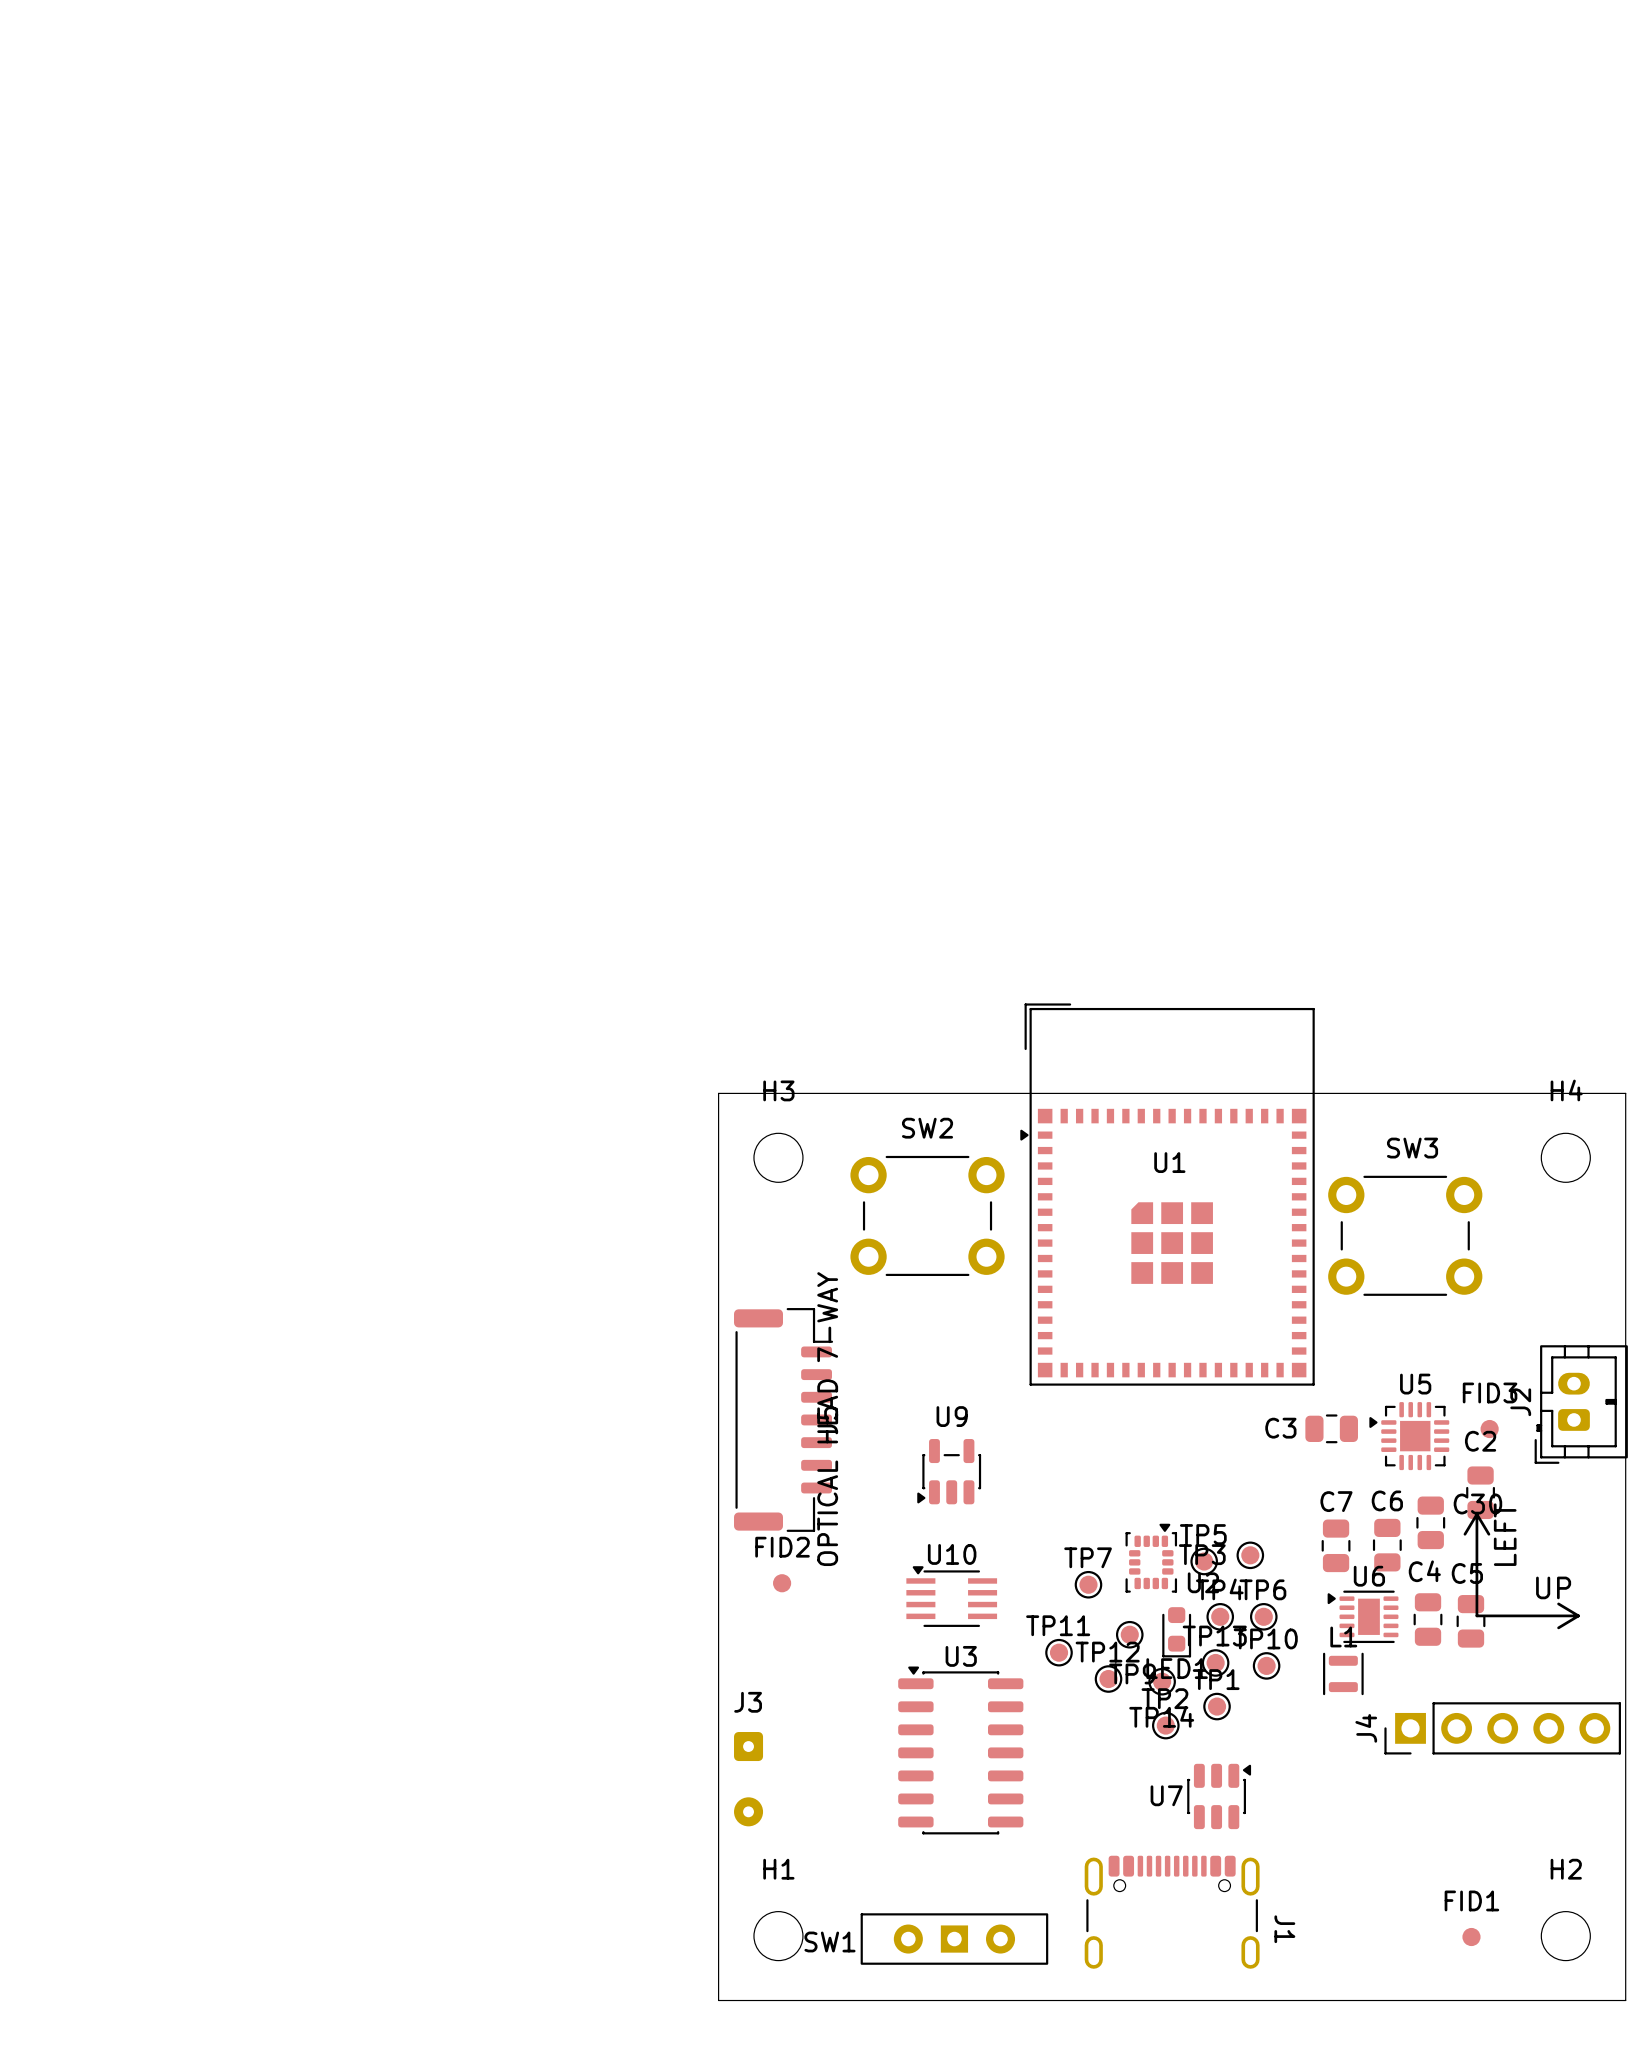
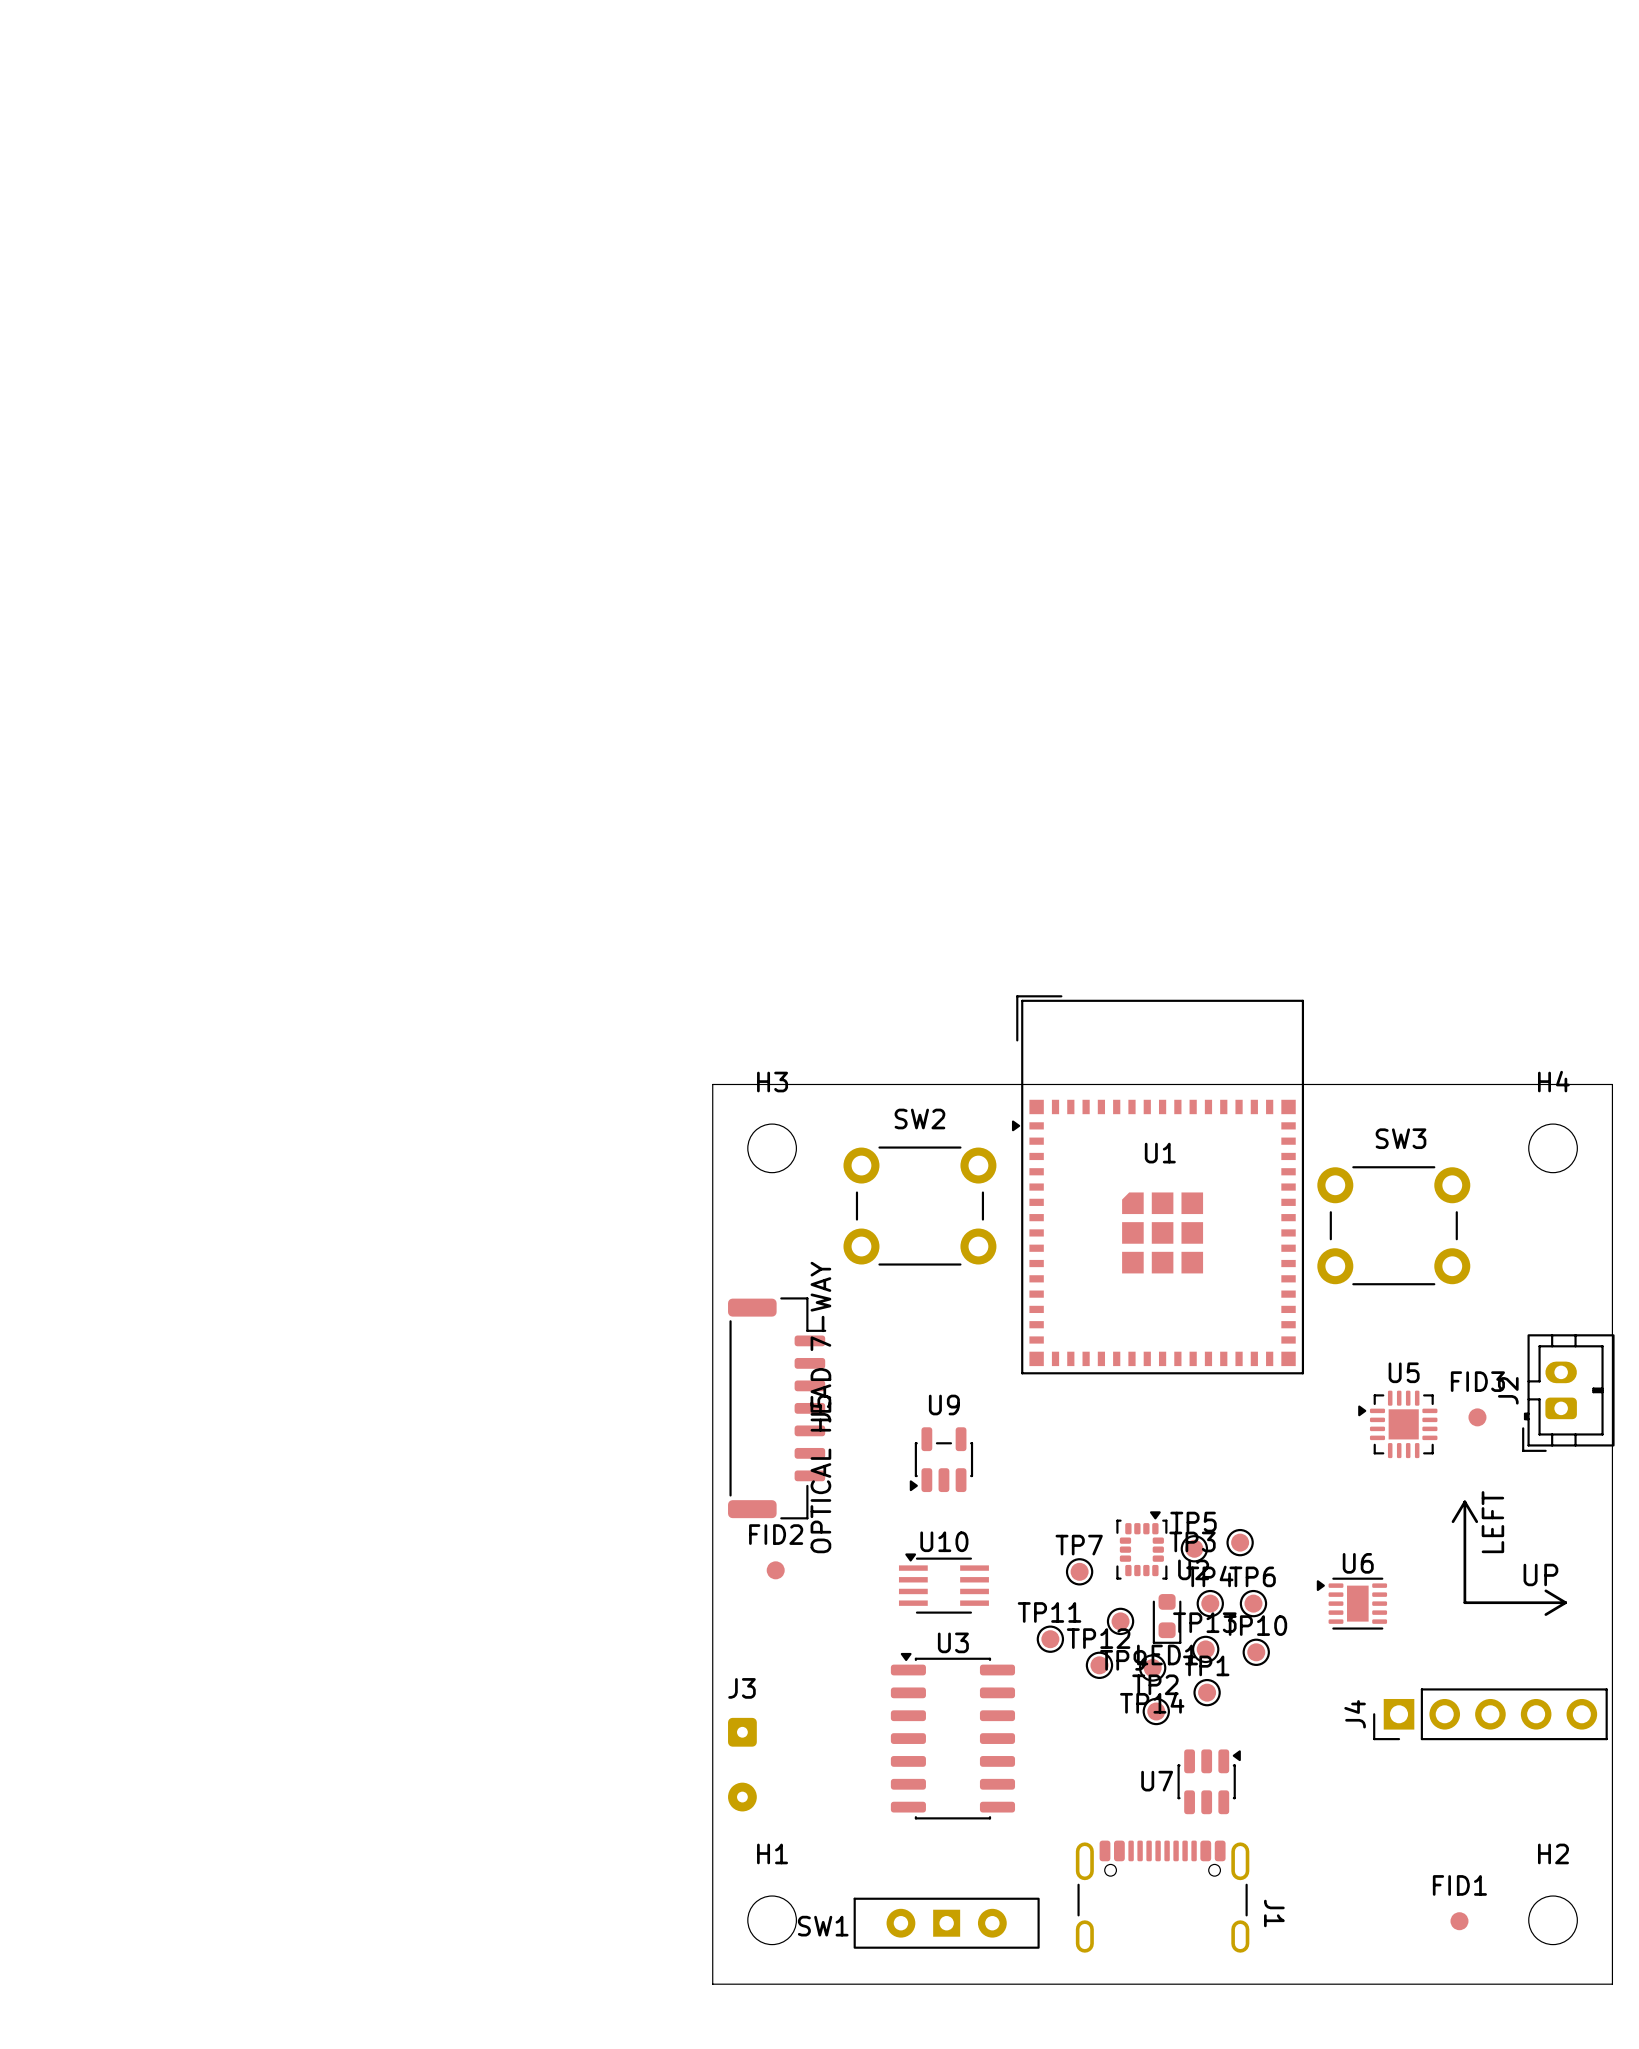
C3: (1331, 1428) -> none
C2: (1480, 1492) -> none
C30: (1430, 1522) -> none
C7: (1336, 1545) -> none
C6: (1387, 1545) -> none
C4: (1428, 1619) -> none
C5: (1471, 1621) -> none
L1: (1343, 1673) -> none

